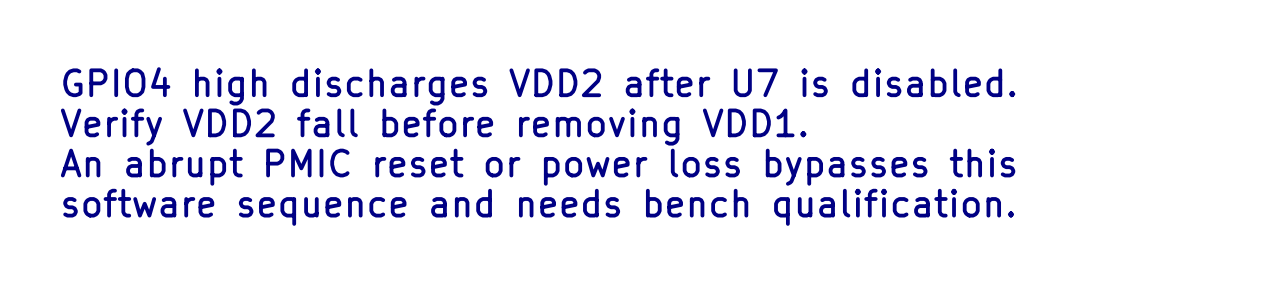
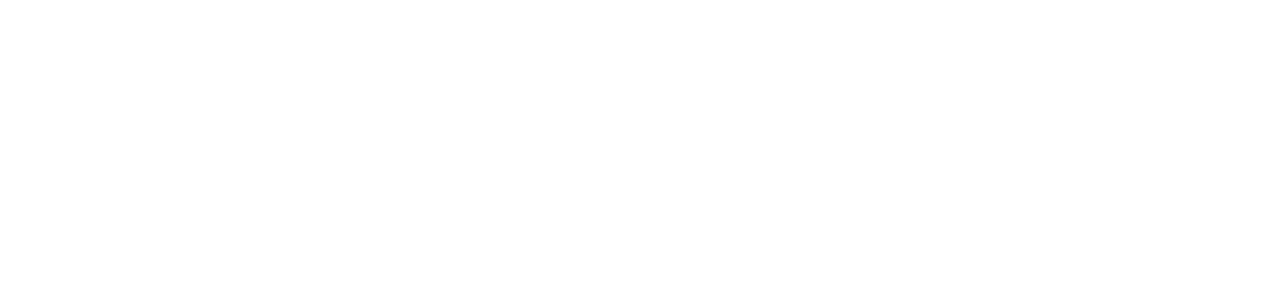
text: GPIO4 high discharges VDD2 after U7 is disabled. (539, 86) -> none
text: Verify VDD2 fall before removing VDD1. (433, 127) -> none
text: An abrupt PMIC reset or power loss bypasses this (538, 167) -> none
text: software sequence and needs bench qualification. (538, 207) -> none

